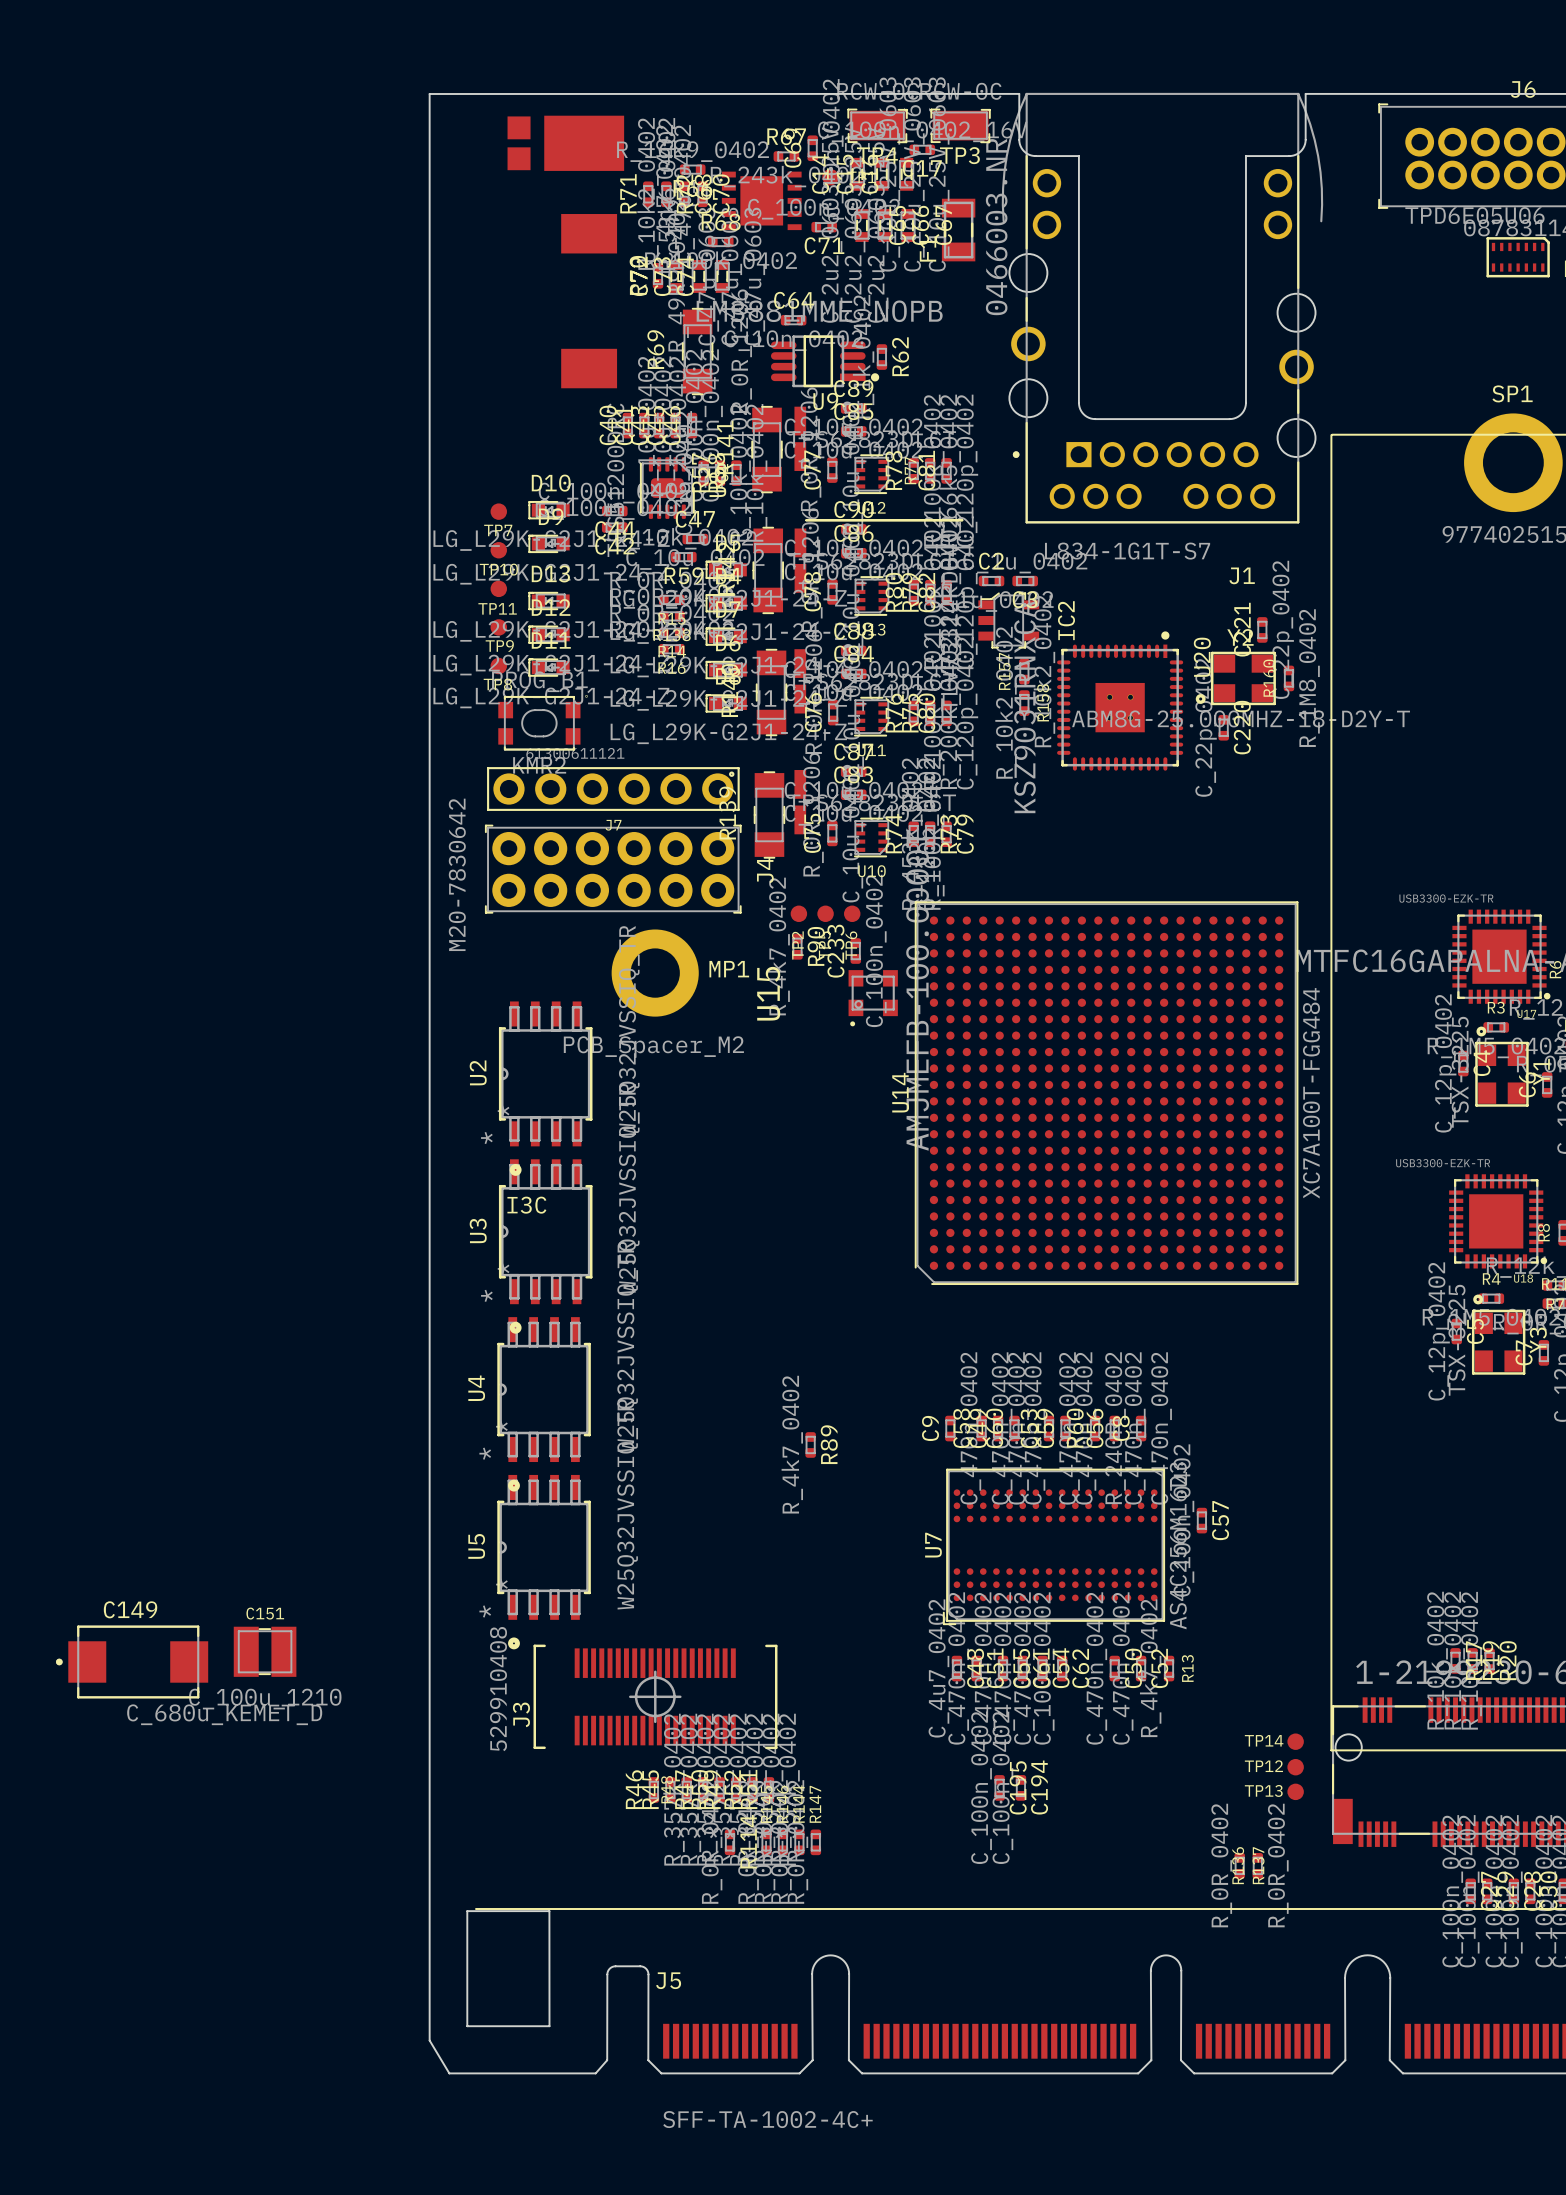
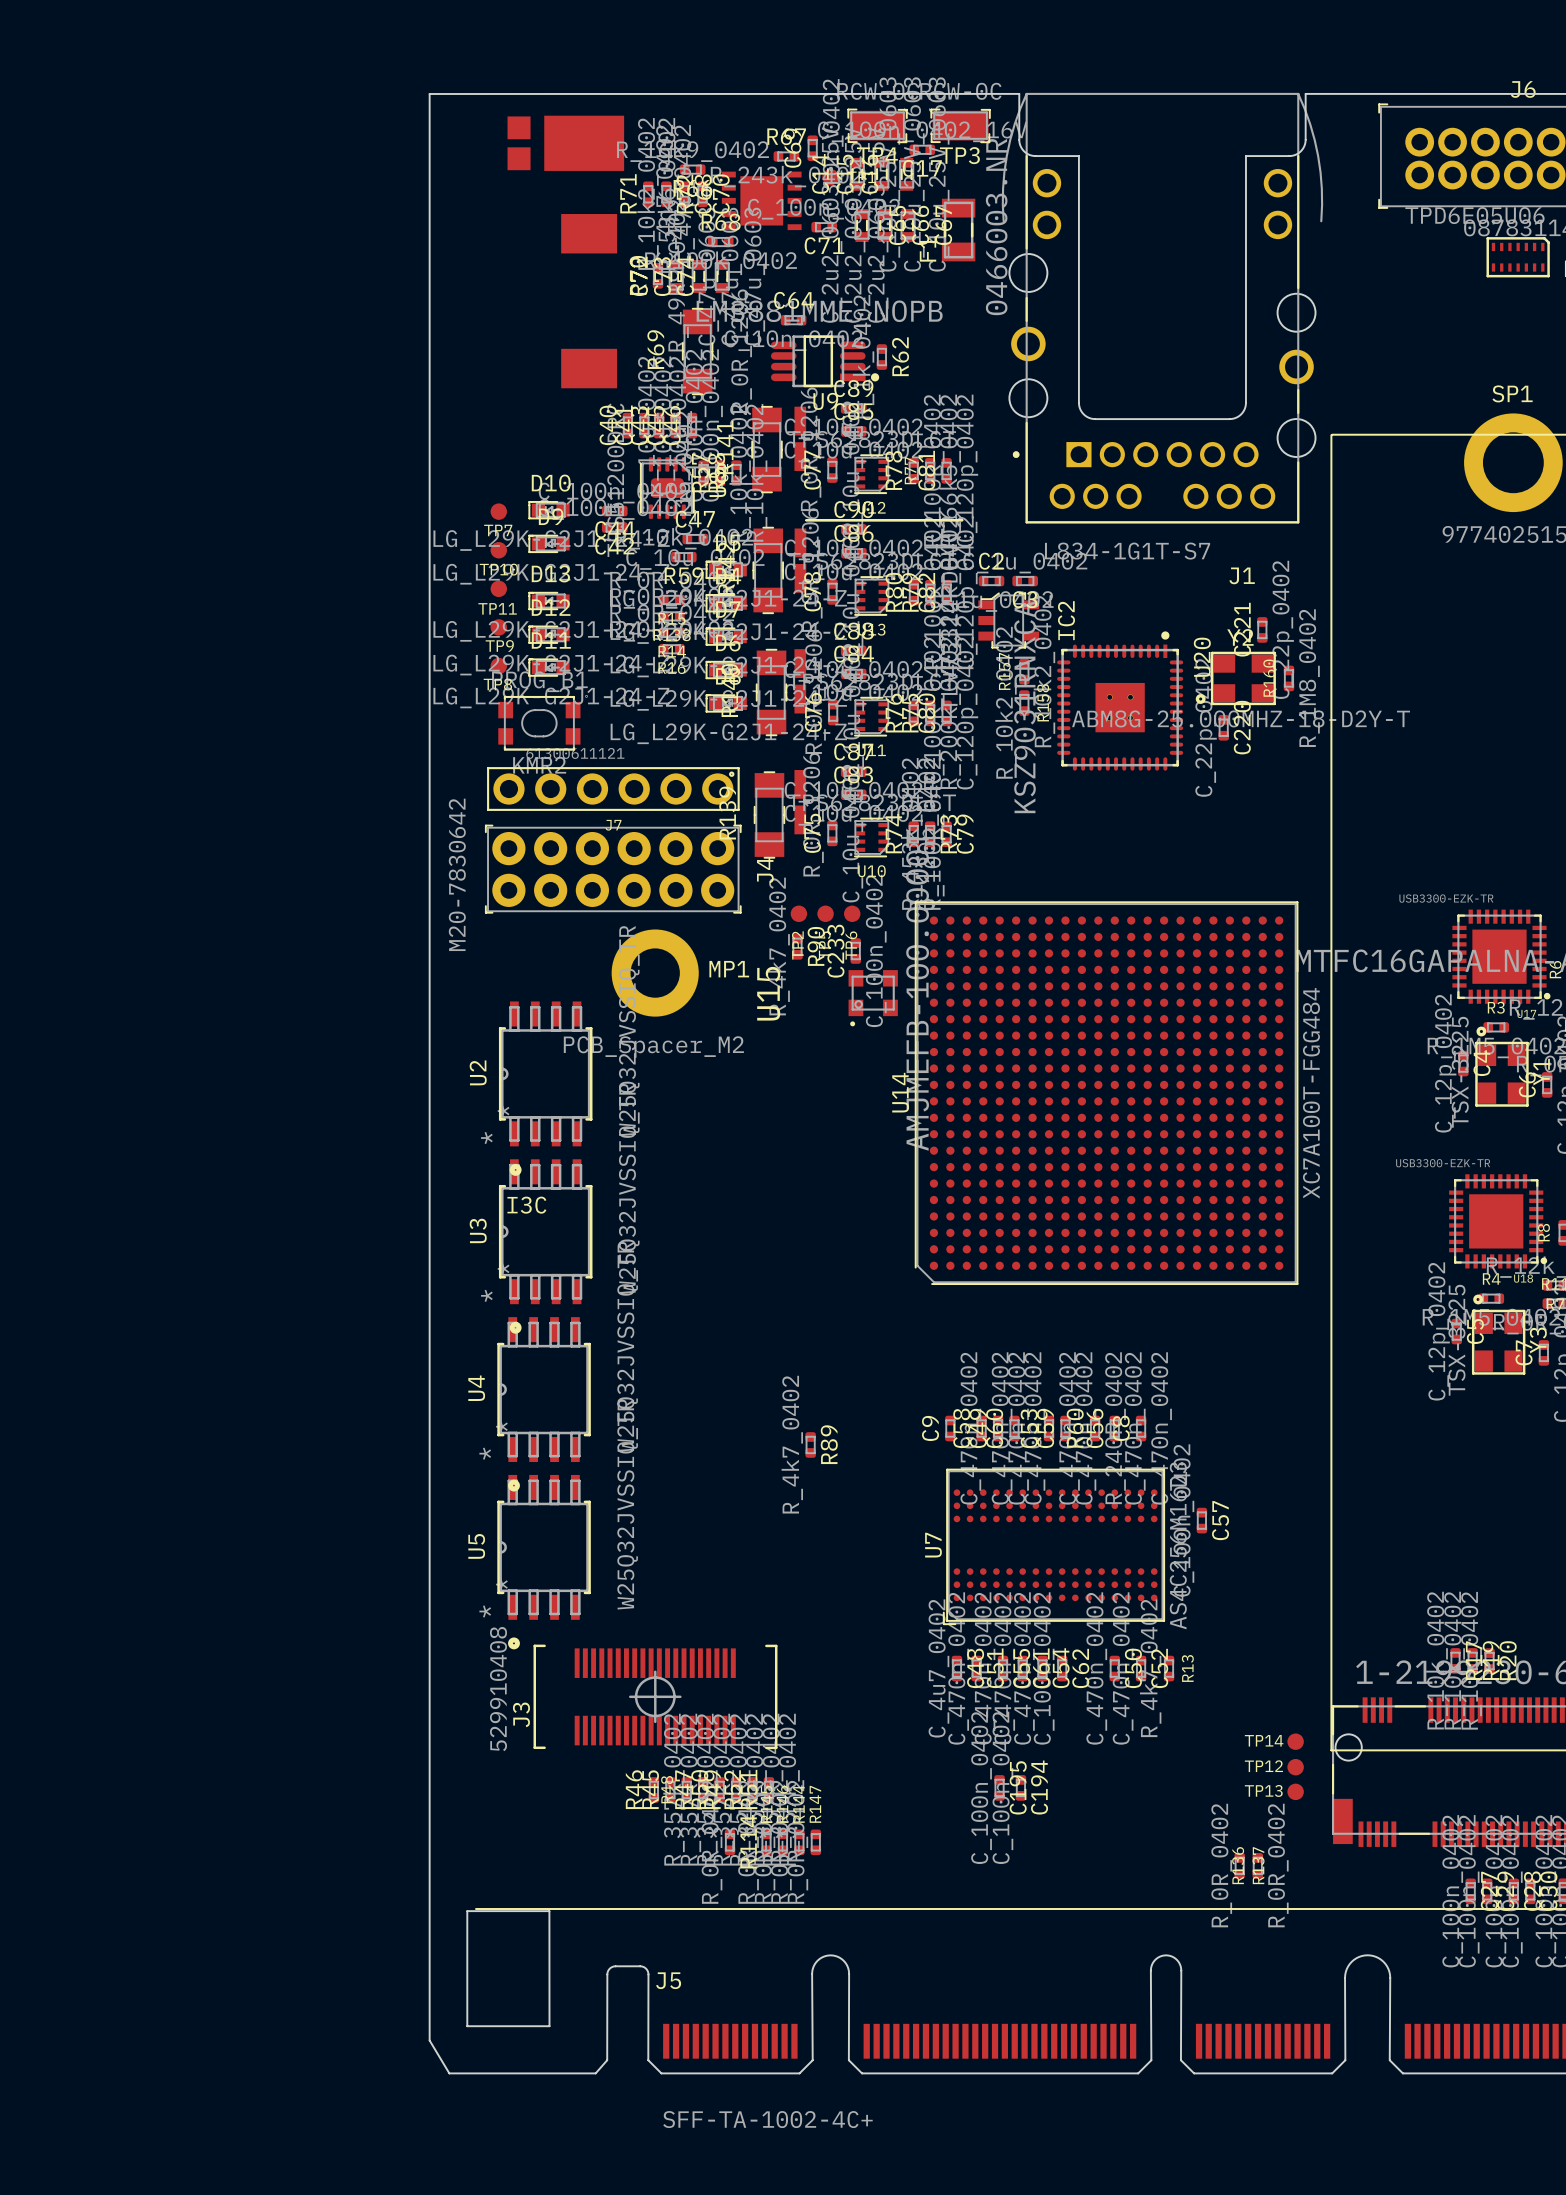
C151: C_100u_1210 (265, 1651) -> none
C149: C_680u_KEMET_D (132, 1661) -> none

